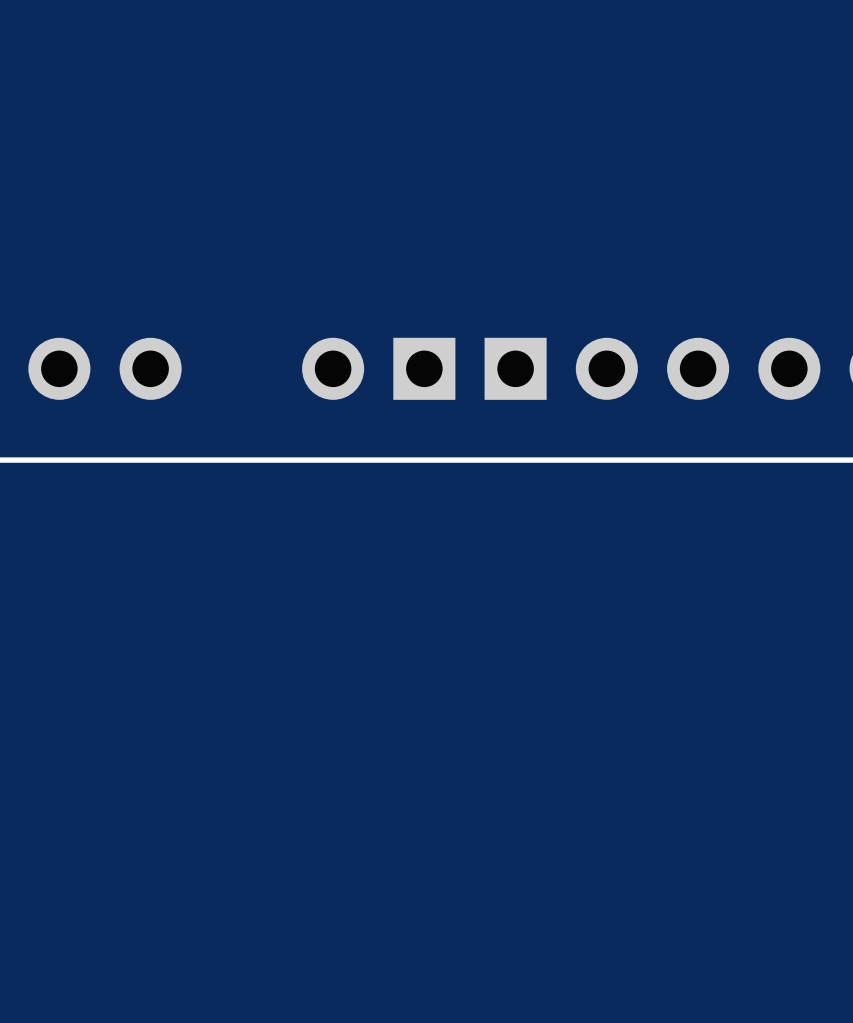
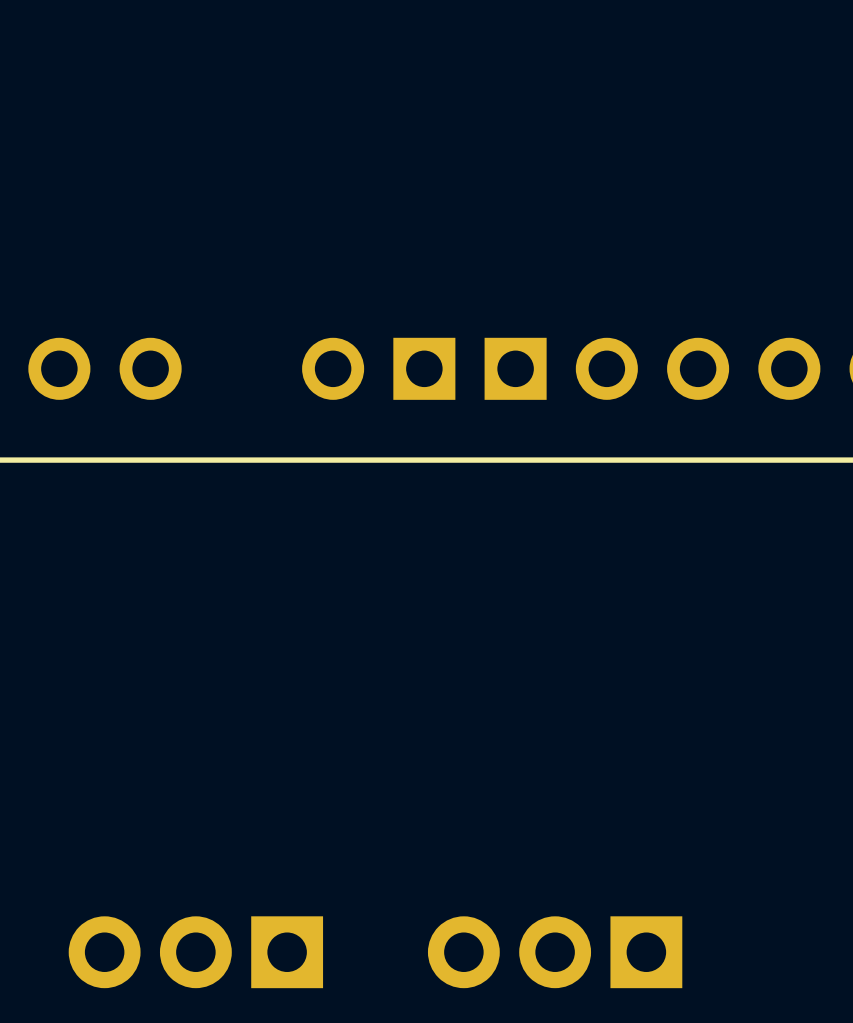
part: none -> (195, 952)
part: none -> (555, 952)

